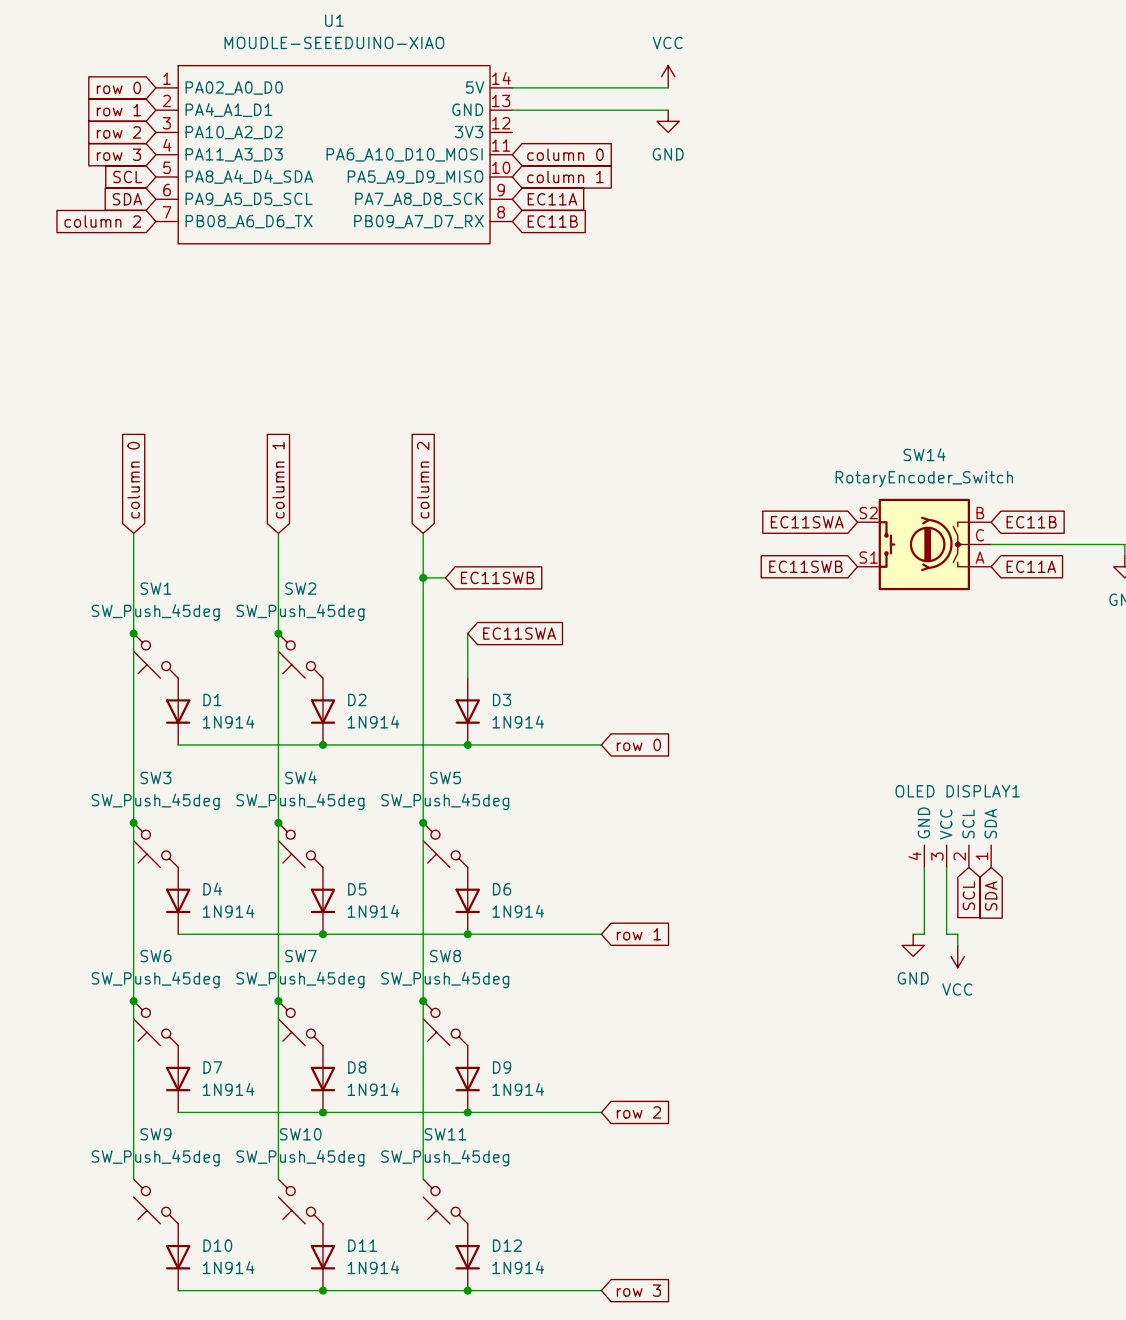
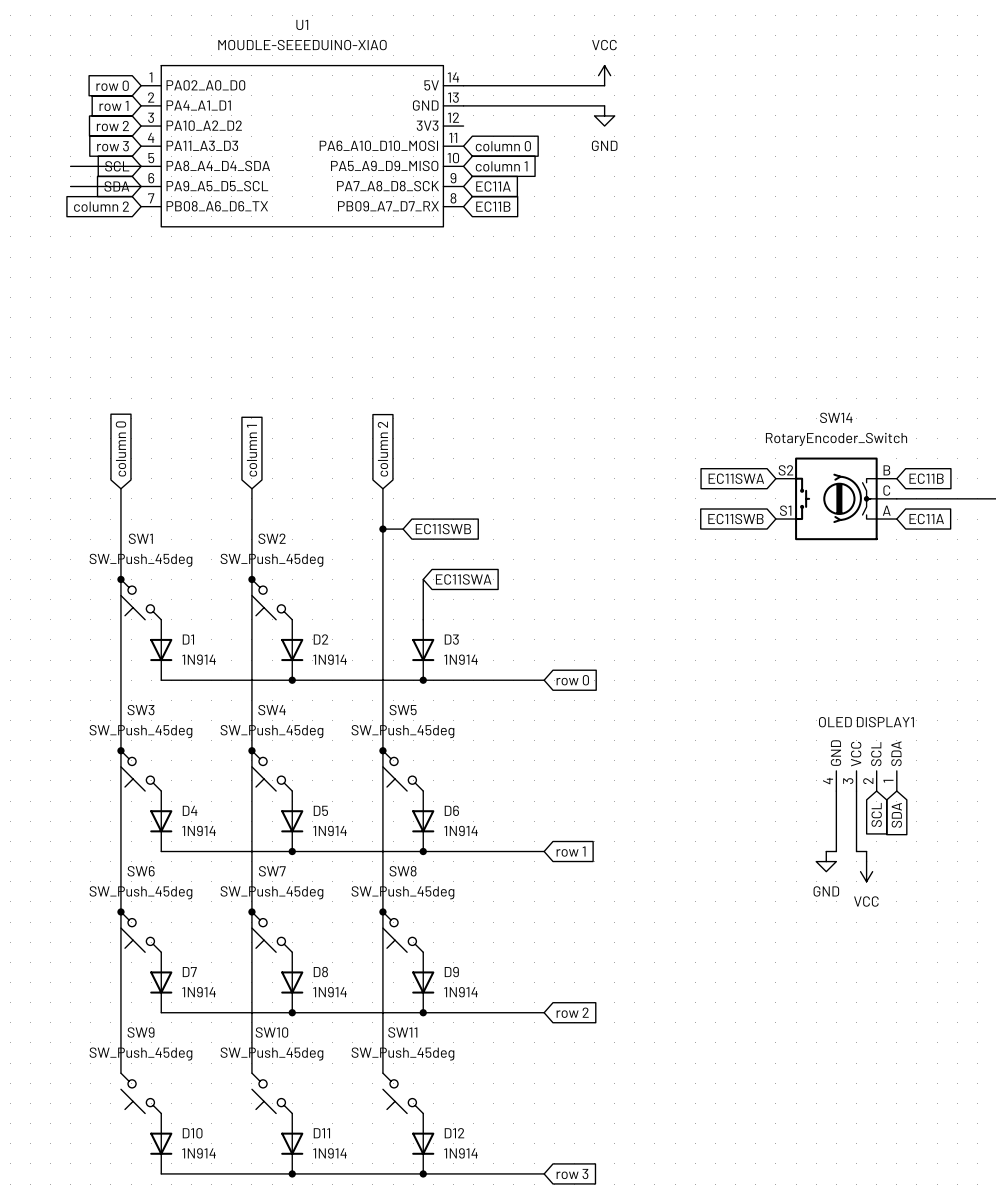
wire: none -> (70, 166) (141, 166)
wire: none -> (70, 186) (141, 186)

